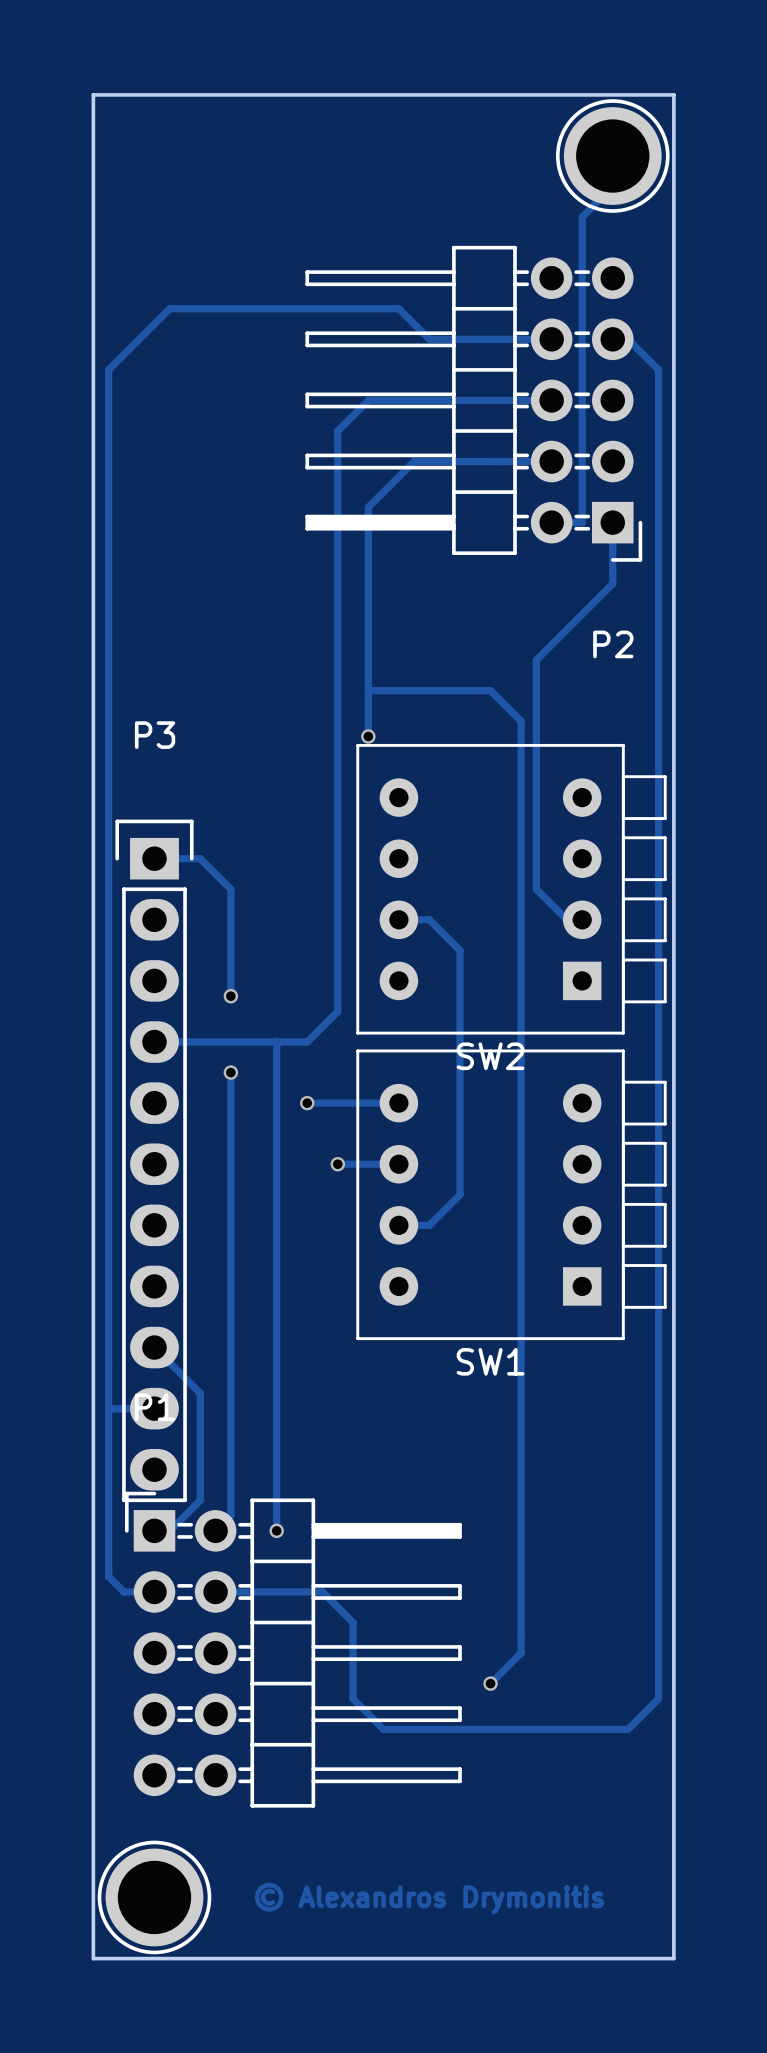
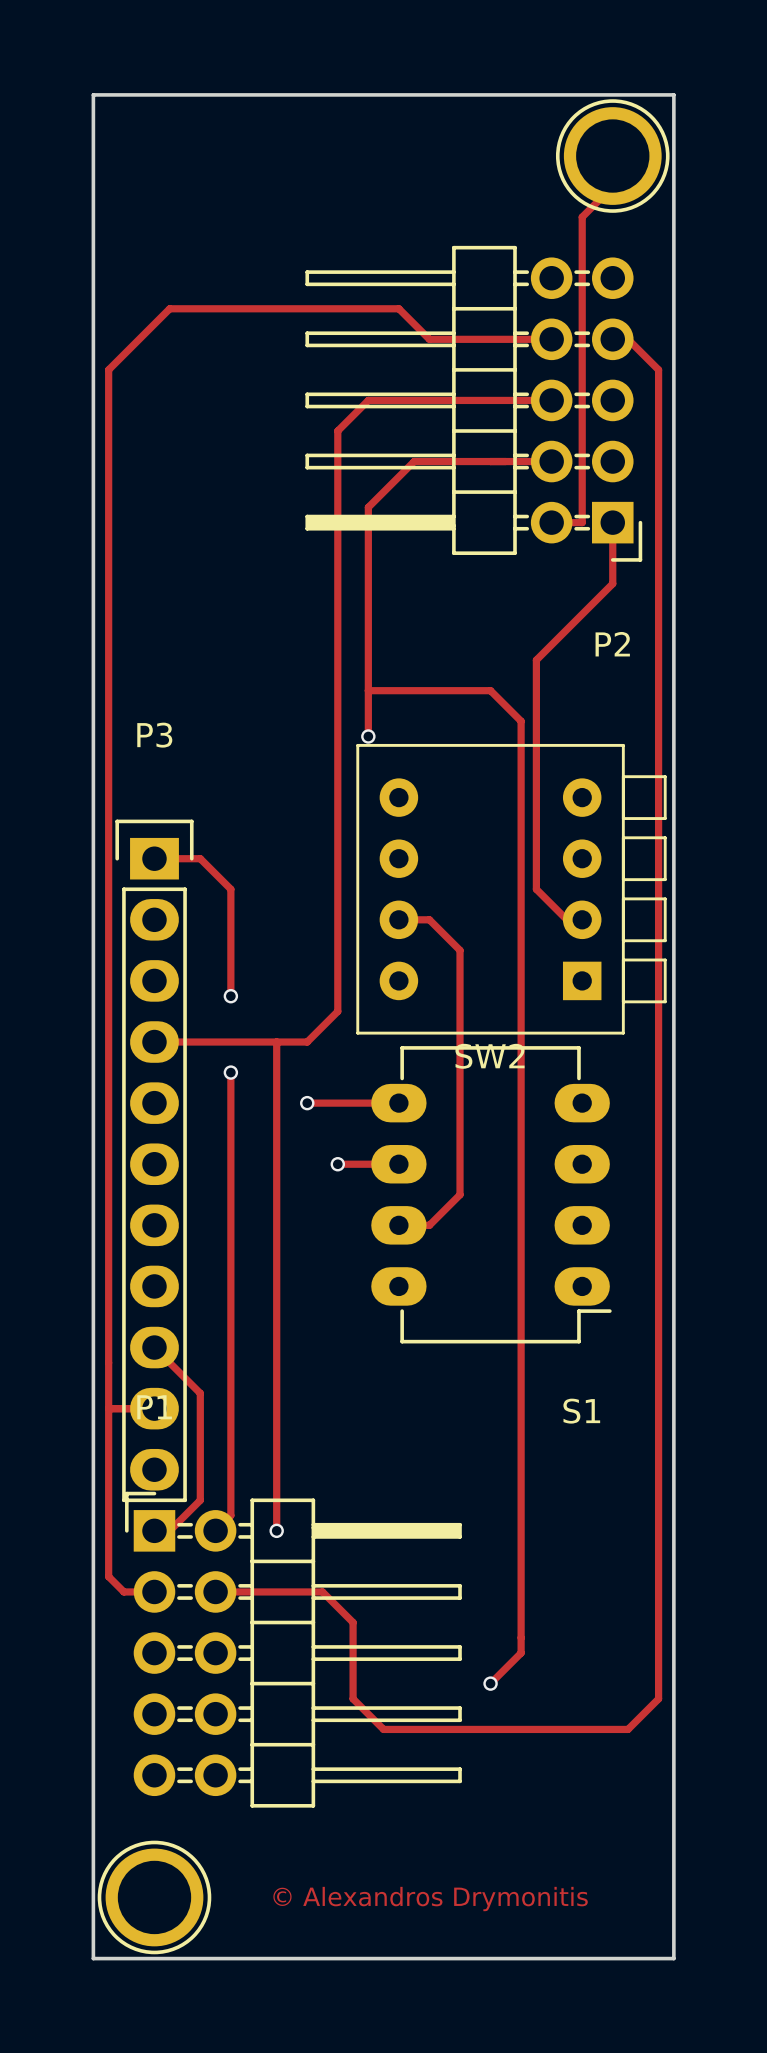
S1: none -> (491, 1194)
SW1: (511, 1194) -> none

